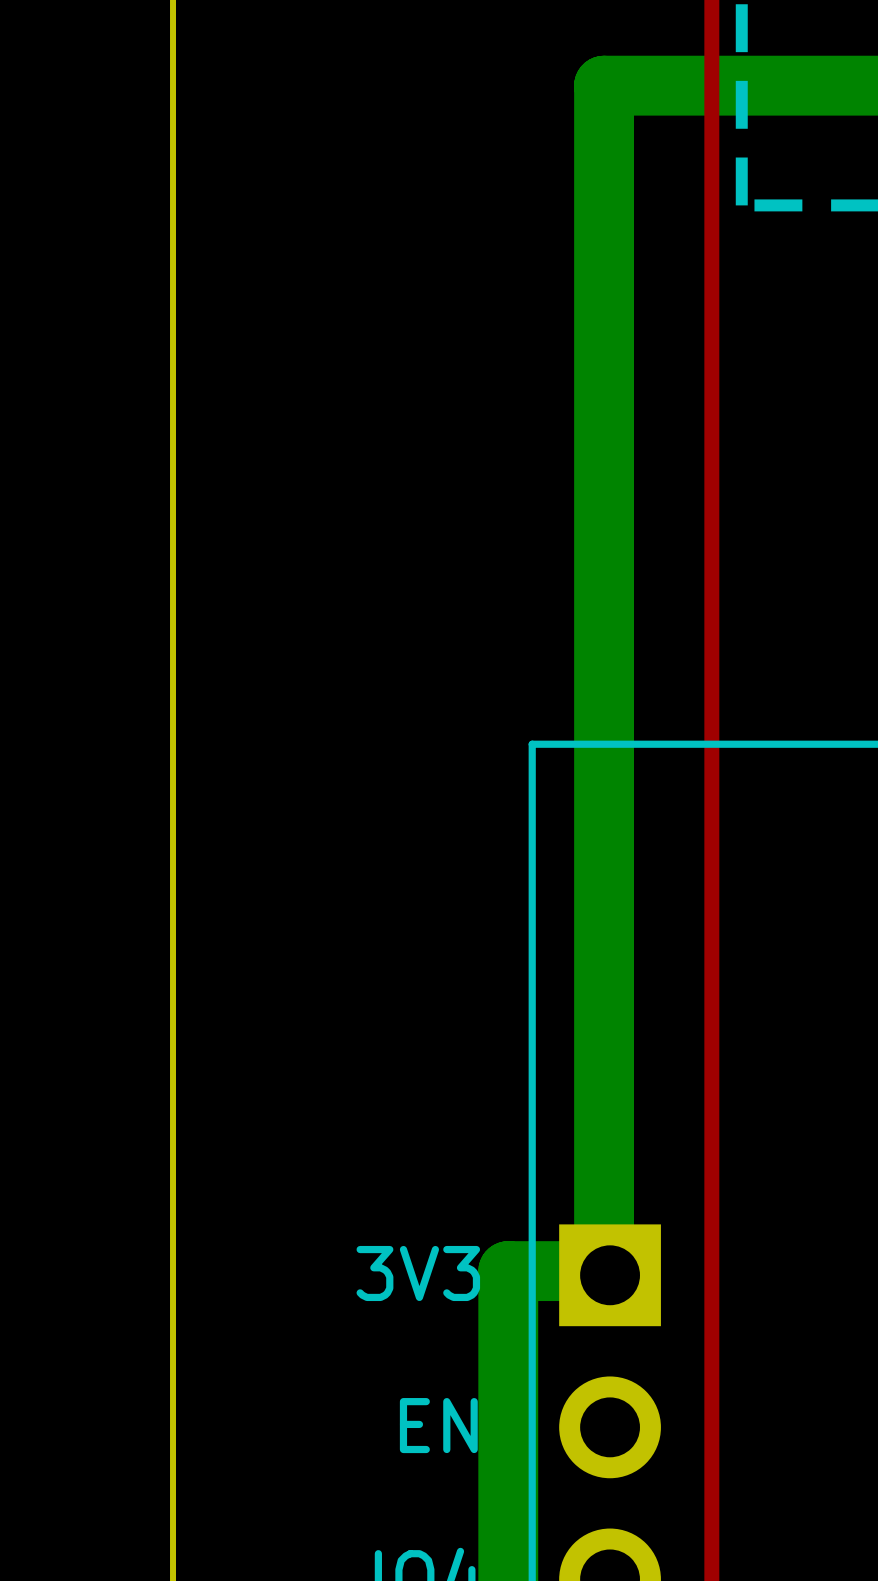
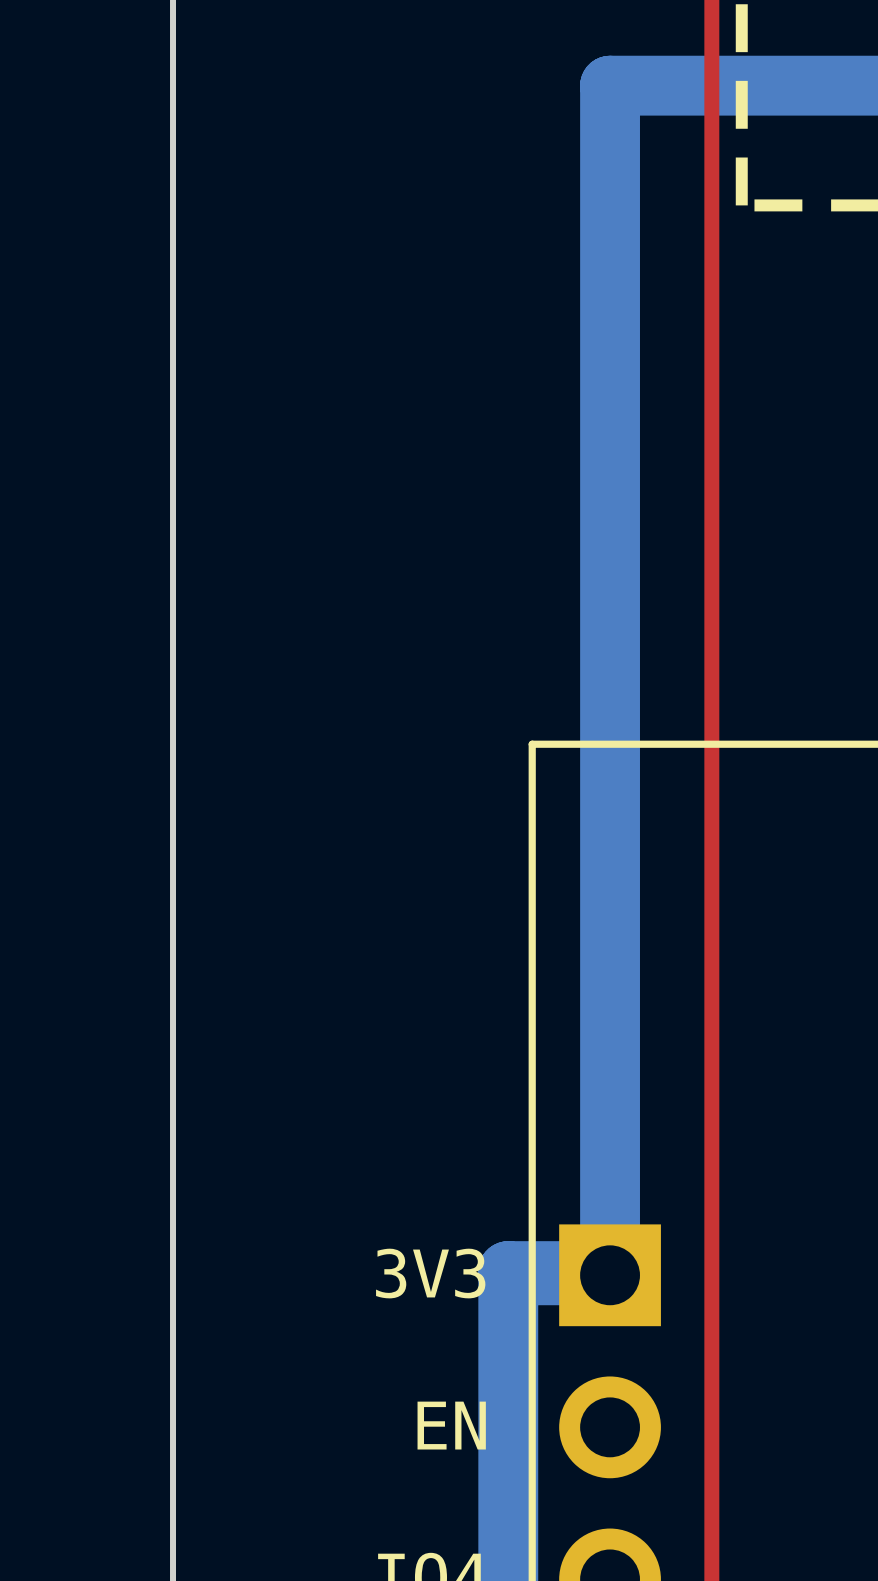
bottom track: (610, 85) (604, 85) (604, 1271) -> (610, 85) (610, 1275) (508, 1275)

